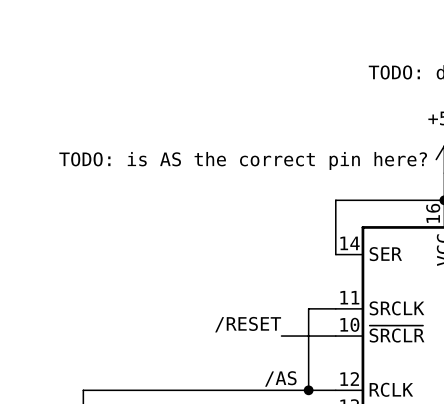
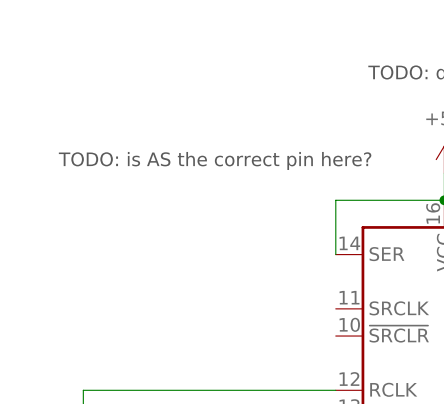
wire: (335, 308) (308, 308) (308, 390) -> none
label: /RESET (248, 324) -> none
wire: (281, 336) (335, 336) -> none
label: /AS (280, 378) -> none
junction: (308, 390) -> none

